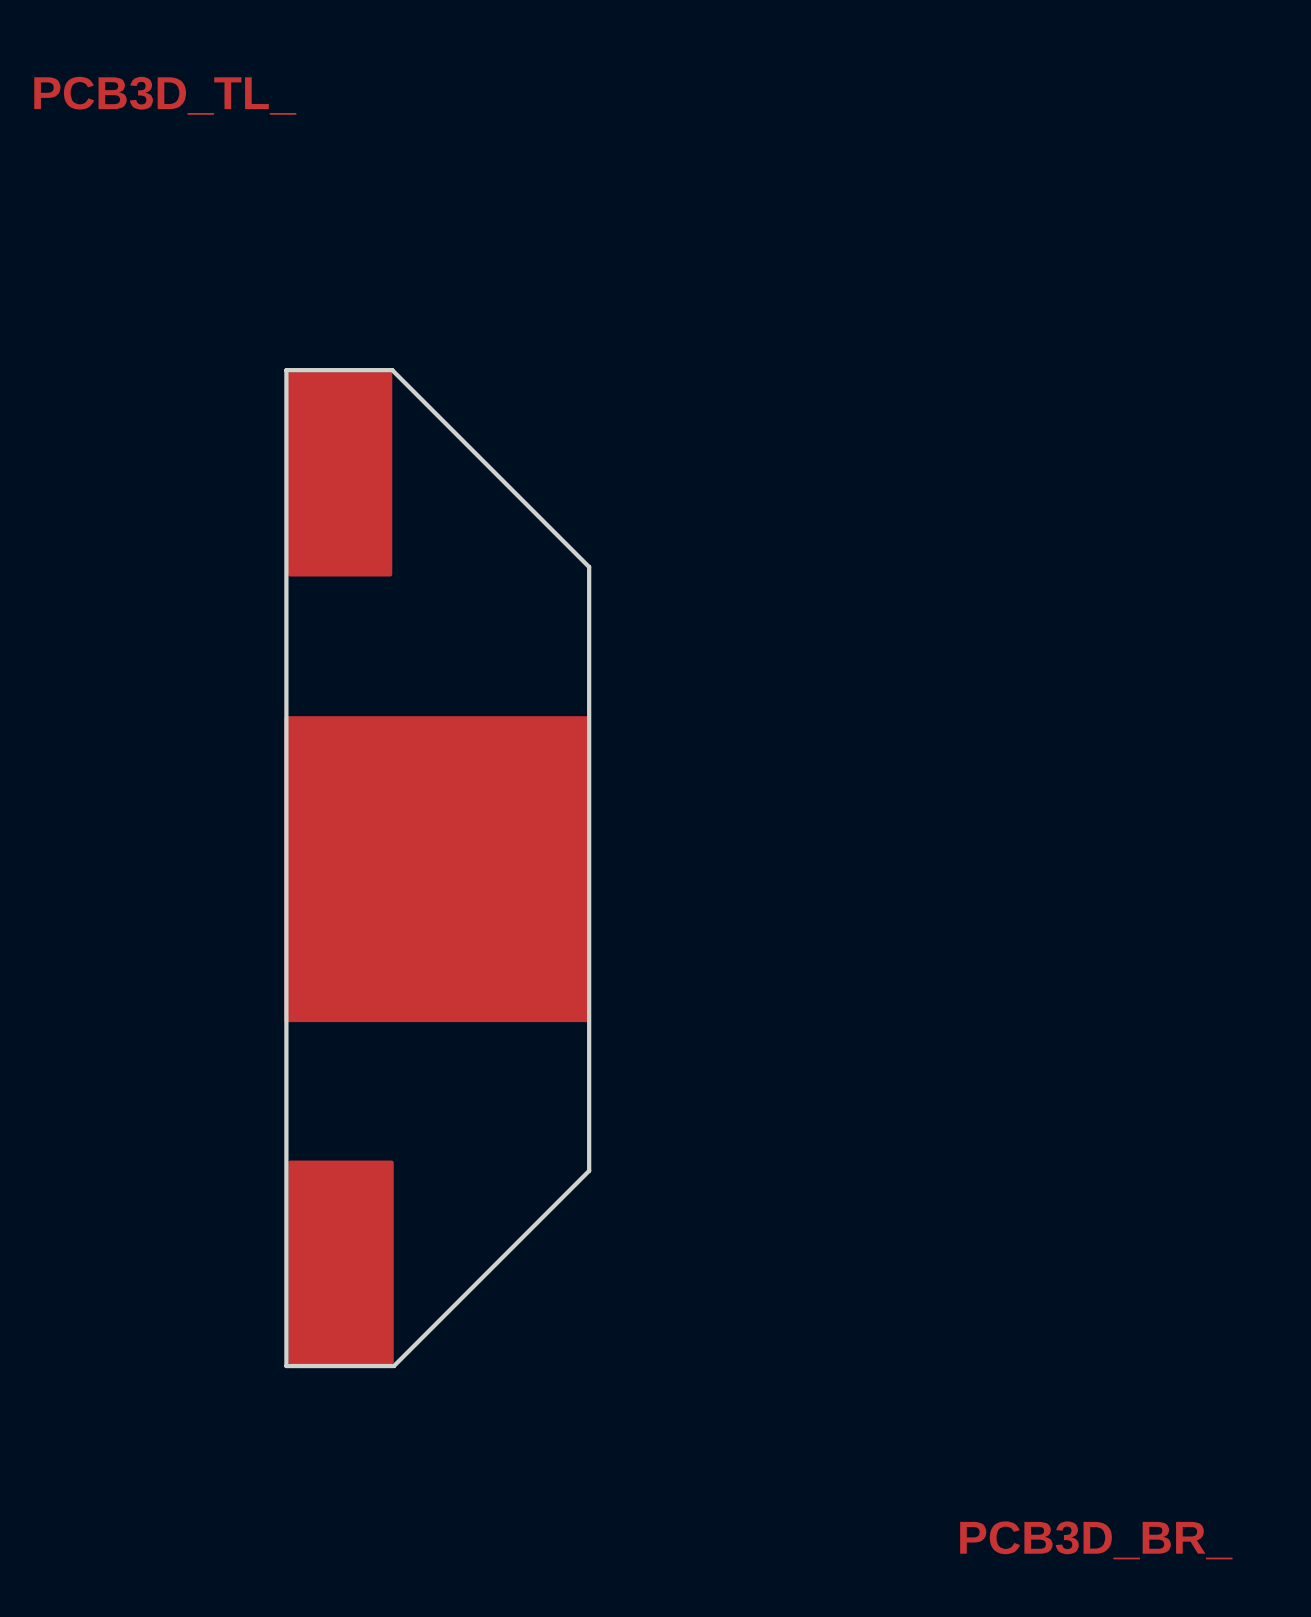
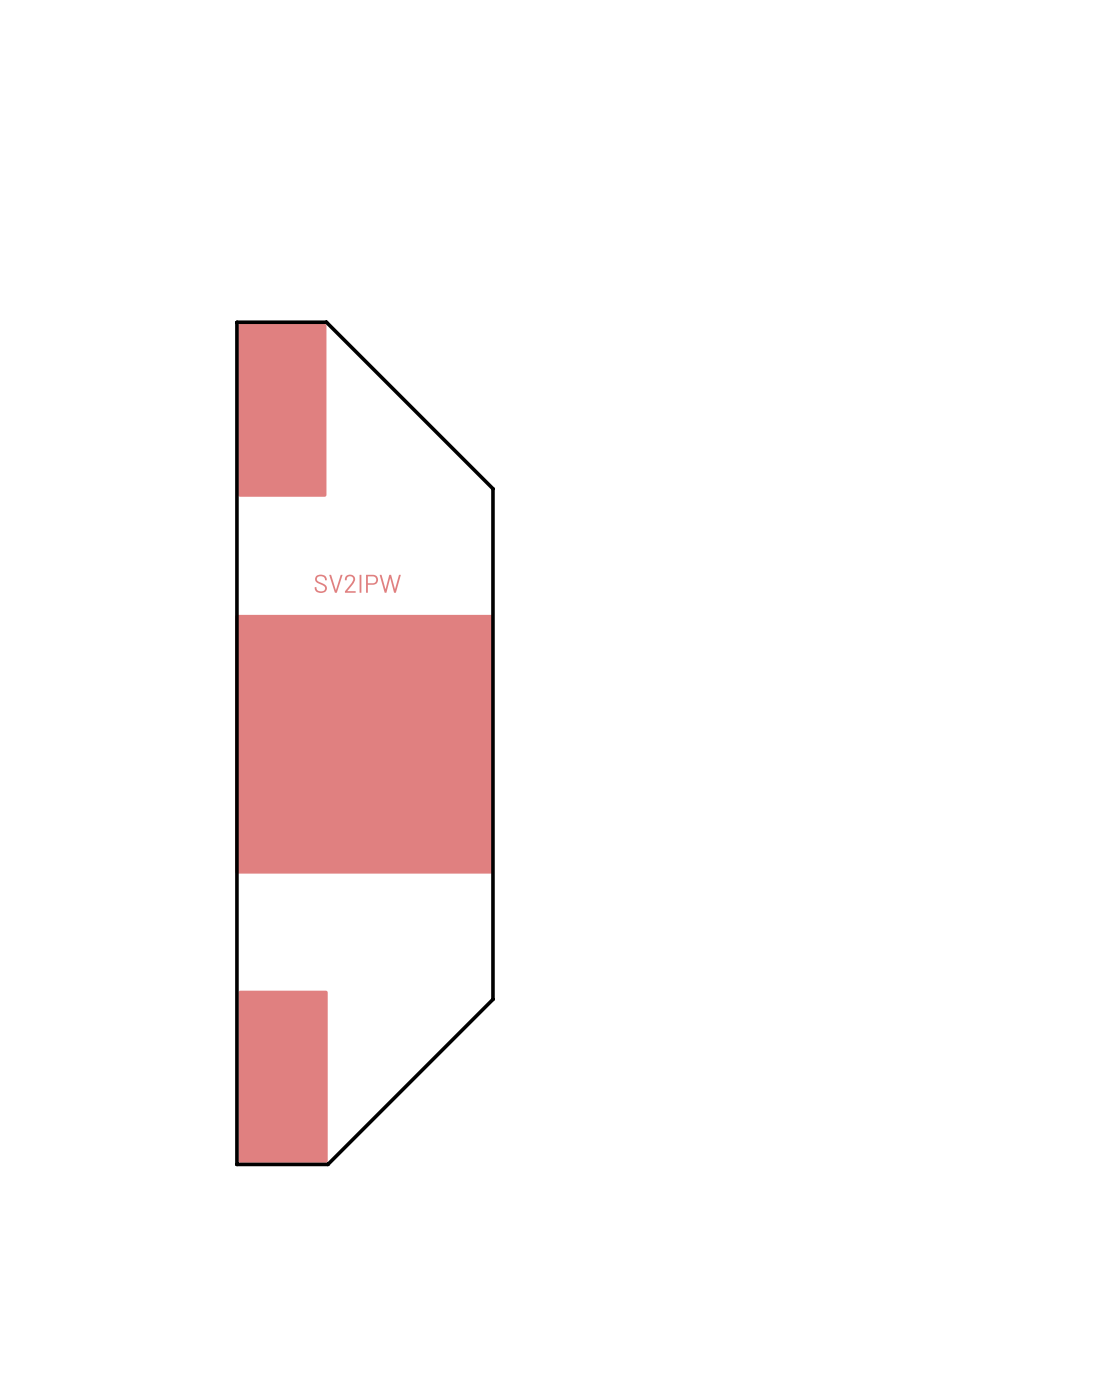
text: PCB3D_TL_ (165, 95) -> none
text: none -> SV2IPW (357, 583)
text: PCB3D_BR_ (1096, 1540) -> none

